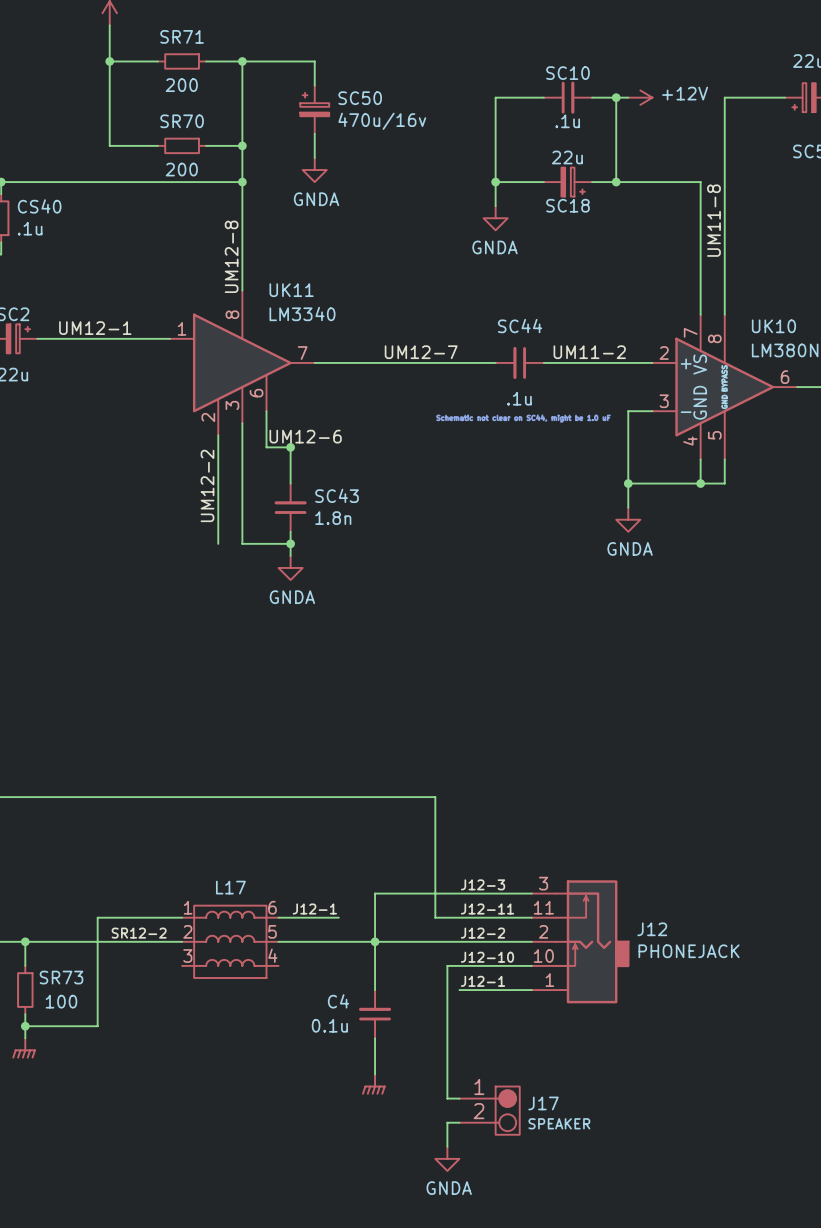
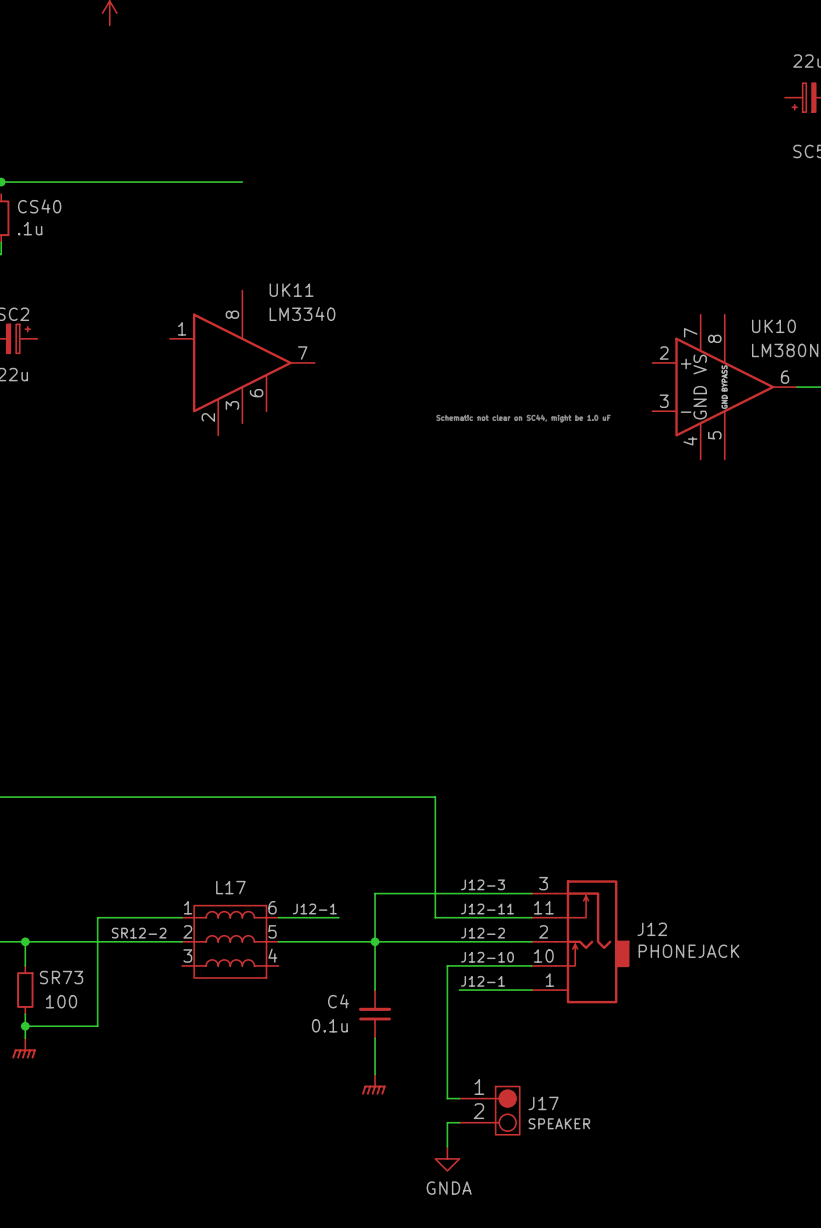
wire: (109, 25) (109, 145) (157, 145) -> none
wire: (109, 61) (157, 61) -> none
junction: (109, 61) -> none
SR71: 200 (182, 61) -> none
wire: (206, 61) (314, 61) (314, 85) -> none
wire: (242, 61) (242, 290) -> none
junction: (242, 61) -> none
wire: (543, 97) (495, 97) (495, 206) -> none
SC10: .1u (567, 97) -> none
wire: (592, 97) (628, 97) -> none
wire: (616, 97) (616, 182) -> none
junction: (616, 97) -> none
power symbol: +12V (640, 97) -> none
wire: (785, 97) (724, 97) (724, 314) -> none
SC50: 470u/16v (314, 109) -> none
wire: (314, 133) (314, 157) -> none
SR70: 200 (182, 145) -> none
wire: (206, 145) (242, 145) -> none
junction: (242, 145) -> none
power symbol: GNDA (314, 170) -> none
wire: (1, 182) (1, 194) -> none
junction: (242, 182) -> none
wire: (495, 182) (543, 182) -> none
junction: (495, 182) -> none
SC18: 22u (567, 182) -> none
wire: (592, 182) (700, 182) (700, 314) -> none
junction: (616, 182) -> none
power symbol: GNDA (495, 218) -> none
label: UM11-8 (714, 220) -> none
label: UM12-8 (231, 256) -> none
label: UM12-1 (95, 328) -> none
wire: (37, 338) (170, 338) -> none
label: UM12-7 (421, 352) -> none
label: UM11-2 (589, 352) -> none
wire: (314, 362) (495, 362) -> none
SC44: .1u (519, 362) -> none
wire: (543, 362) (652, 362) -> none
wire: (266, 411) (266, 447) (290, 447) (290, 483) -> none
wire: (652, 411) (628, 411) (628, 507) -> none
wire: (242, 423) (242, 543) (290, 543) -> none
wire: (218, 435) (218, 543) -> none
label: UM12-6 (305, 436) -> none
junction: (290, 447) -> none
wire: (700, 459) (700, 483) -> none
wire: (724, 459) (724, 483) (628, 483) -> none
junction: (628, 483) -> none
junction: (700, 483) -> none
label: UM12-2 (207, 485) -> none
SC43: 1.8n (290, 507) -> none
power symbol: GNDA (628, 519) -> none
wire: (290, 531) (290, 555) -> none
junction: (290, 543) -> none
power symbol: GNDA (290, 567) -> none

